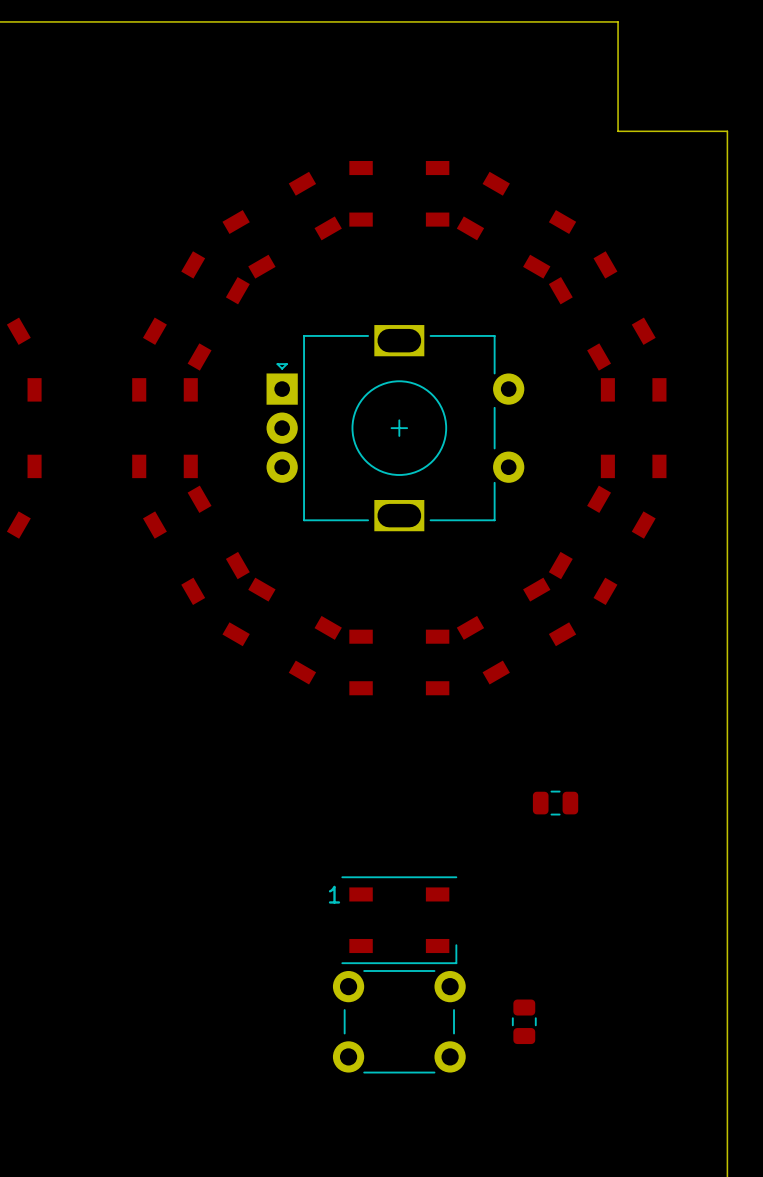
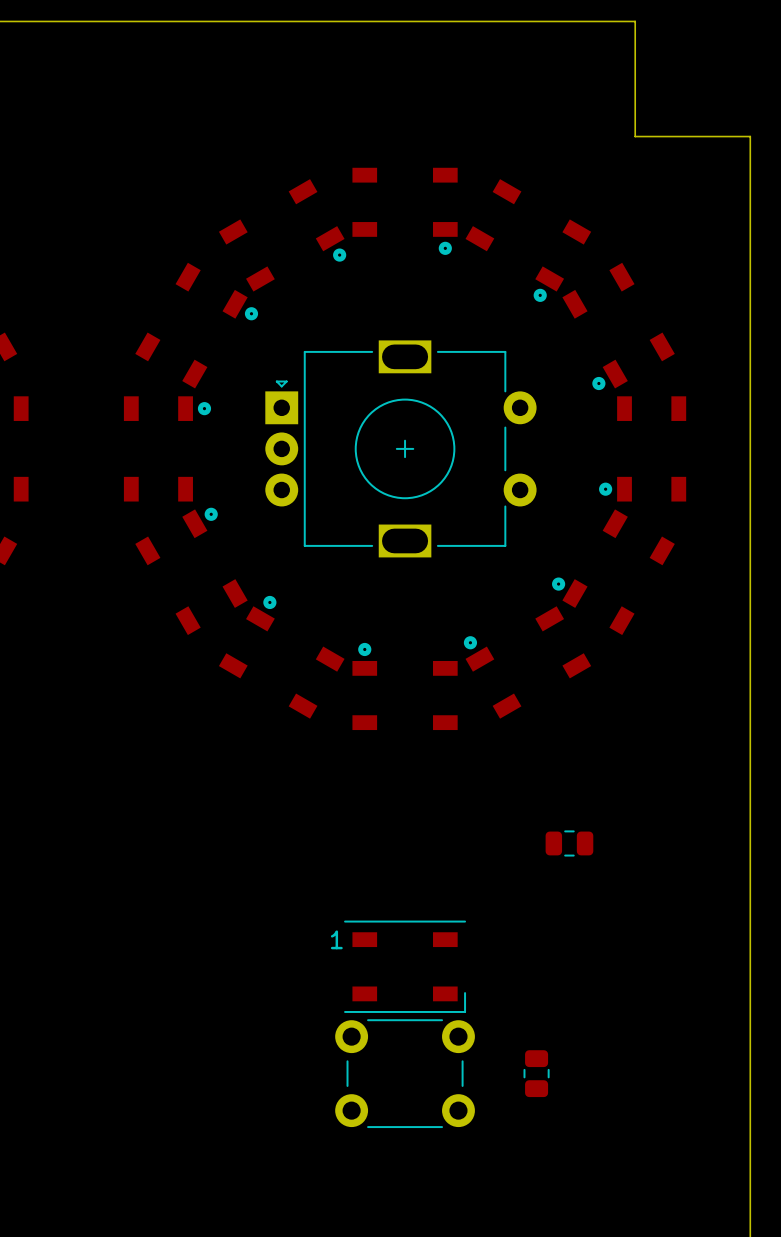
drawing: none -> [438, 241, 452, 255]
drawing: none -> [333, 248, 347, 262]
drawing: none -> [533, 288, 547, 302]
drawing: none -> [244, 307, 259, 321]
drawing: none -> [592, 376, 606, 391]
drawing: none -> [197, 402, 212, 416]
drawing: none -> [599, 482, 613, 496]
drawing: none -> [204, 507, 218, 521]
drawing: none -> [552, 577, 566, 591]
drawing: none -> [263, 595, 277, 610]
drawing: none -> [463, 636, 478, 650]
drawing: none -> [358, 642, 372, 657]

